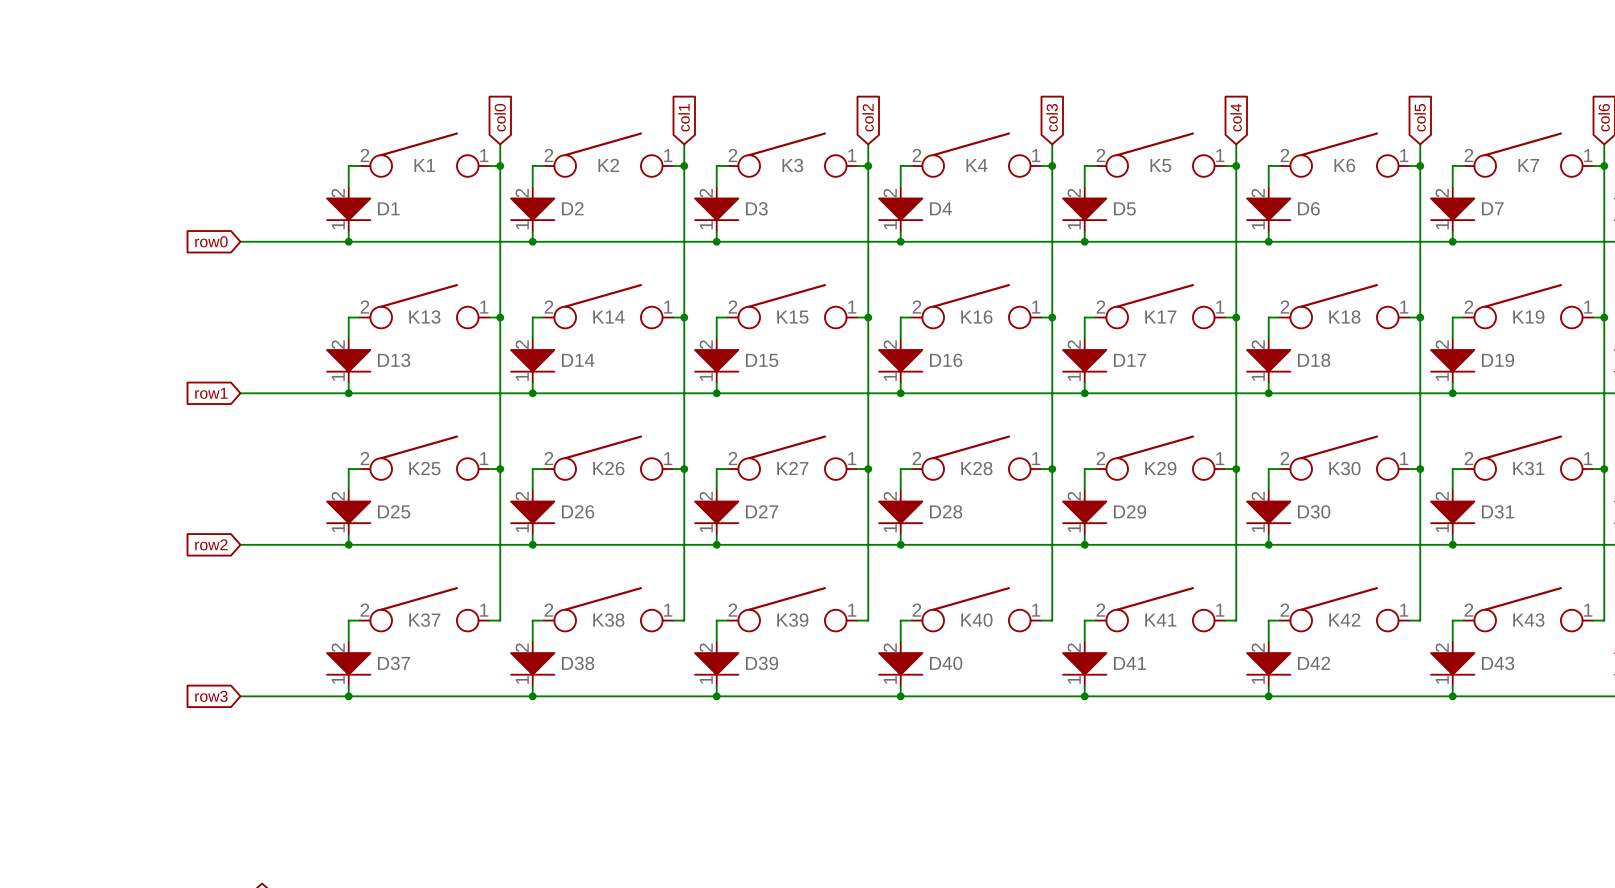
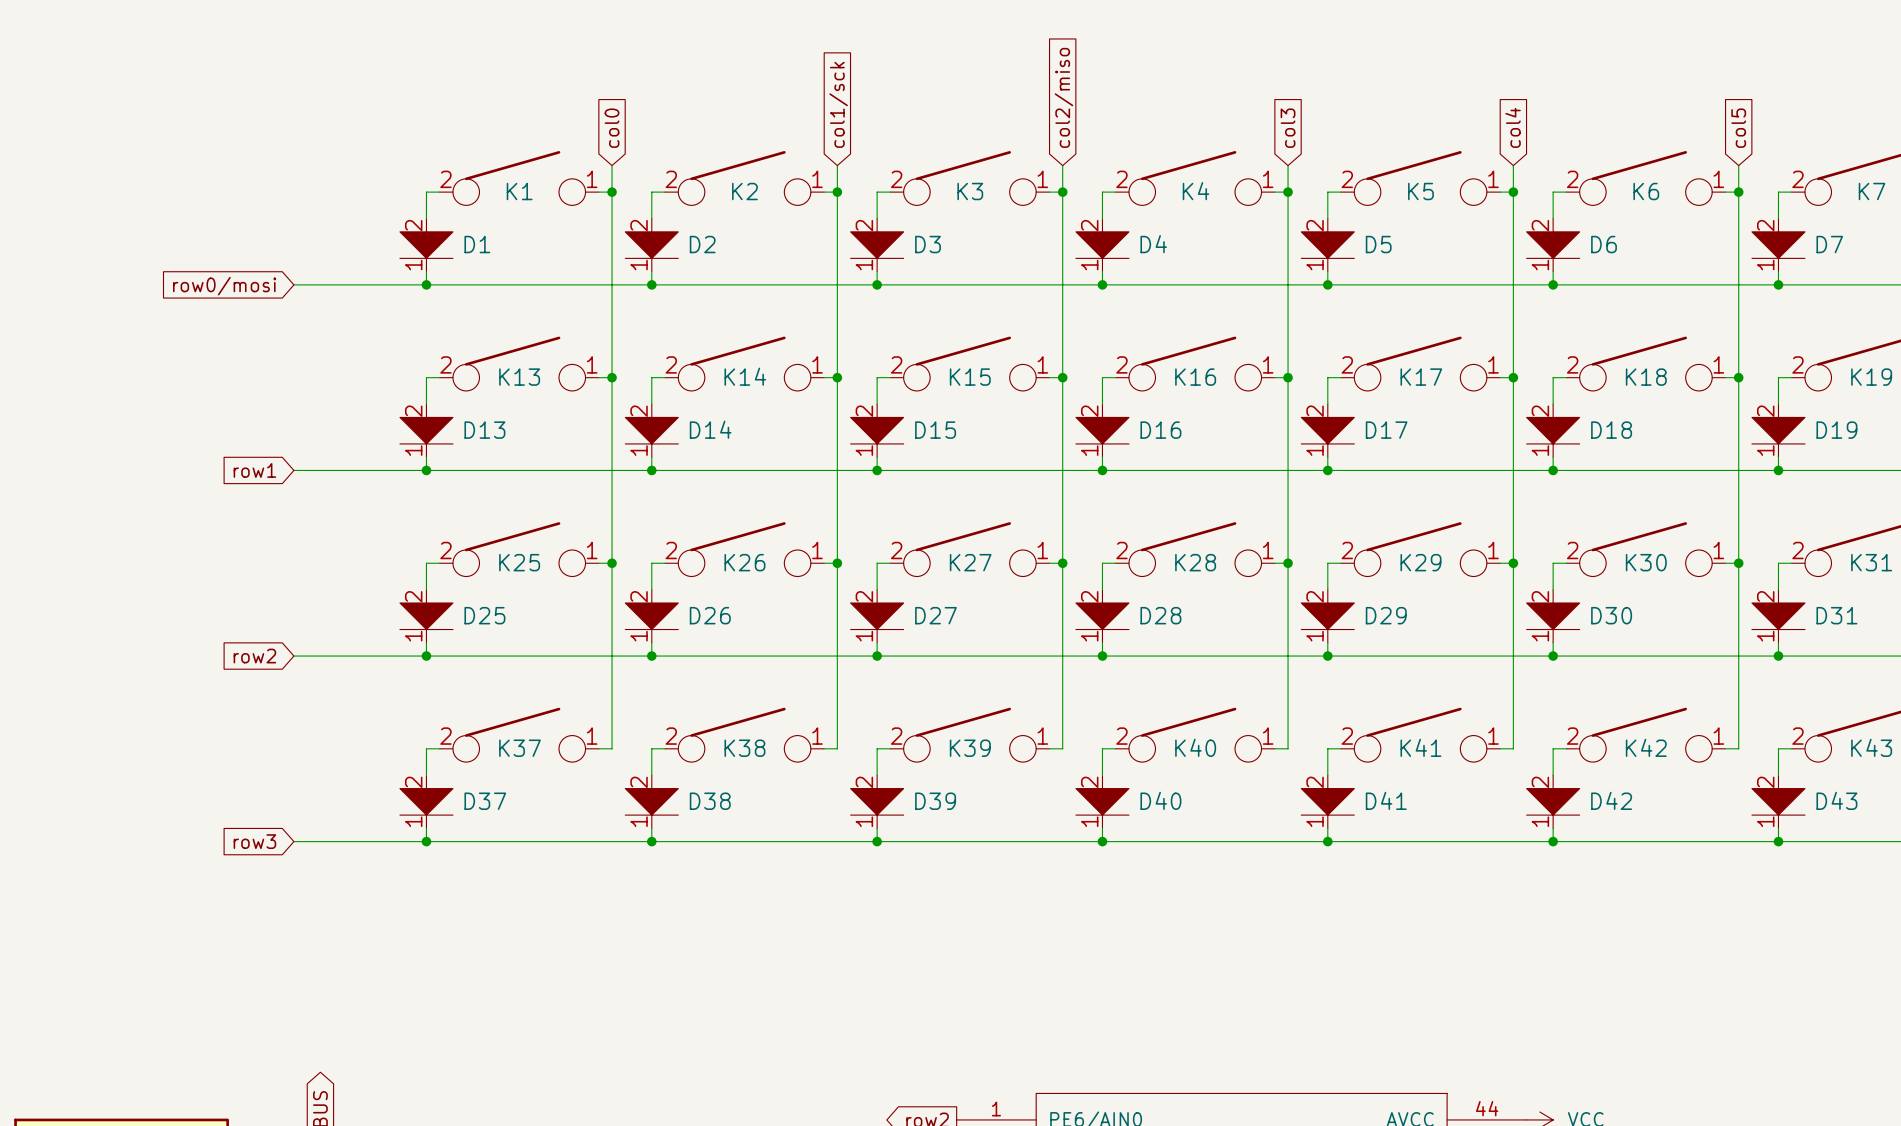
global label: col1 (684, 117) -> col1/sck (838, 104)
global label: col2 (868, 117) -> col2/miso (1063, 97)
global label: row0 (211, 241) -> row0/mosi (224, 286)

